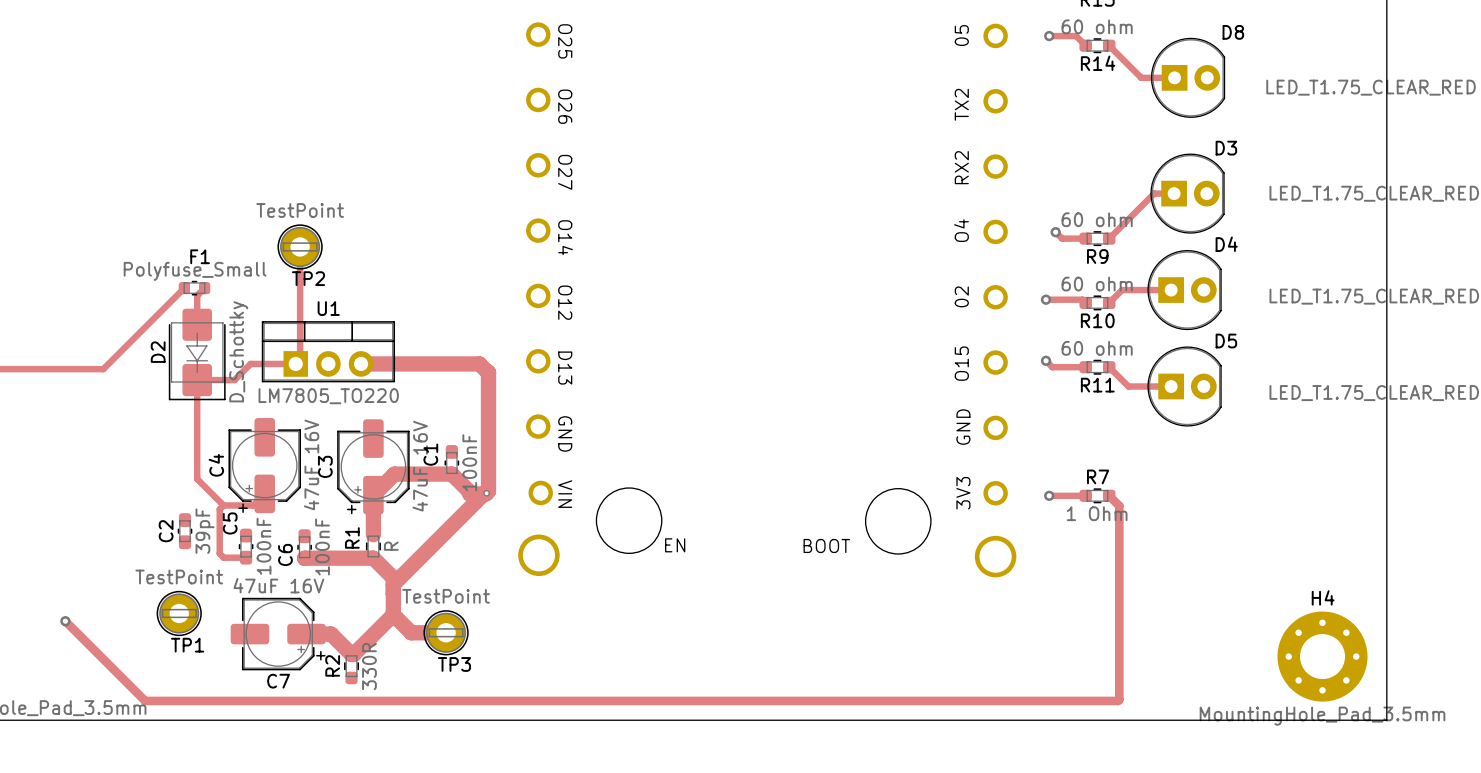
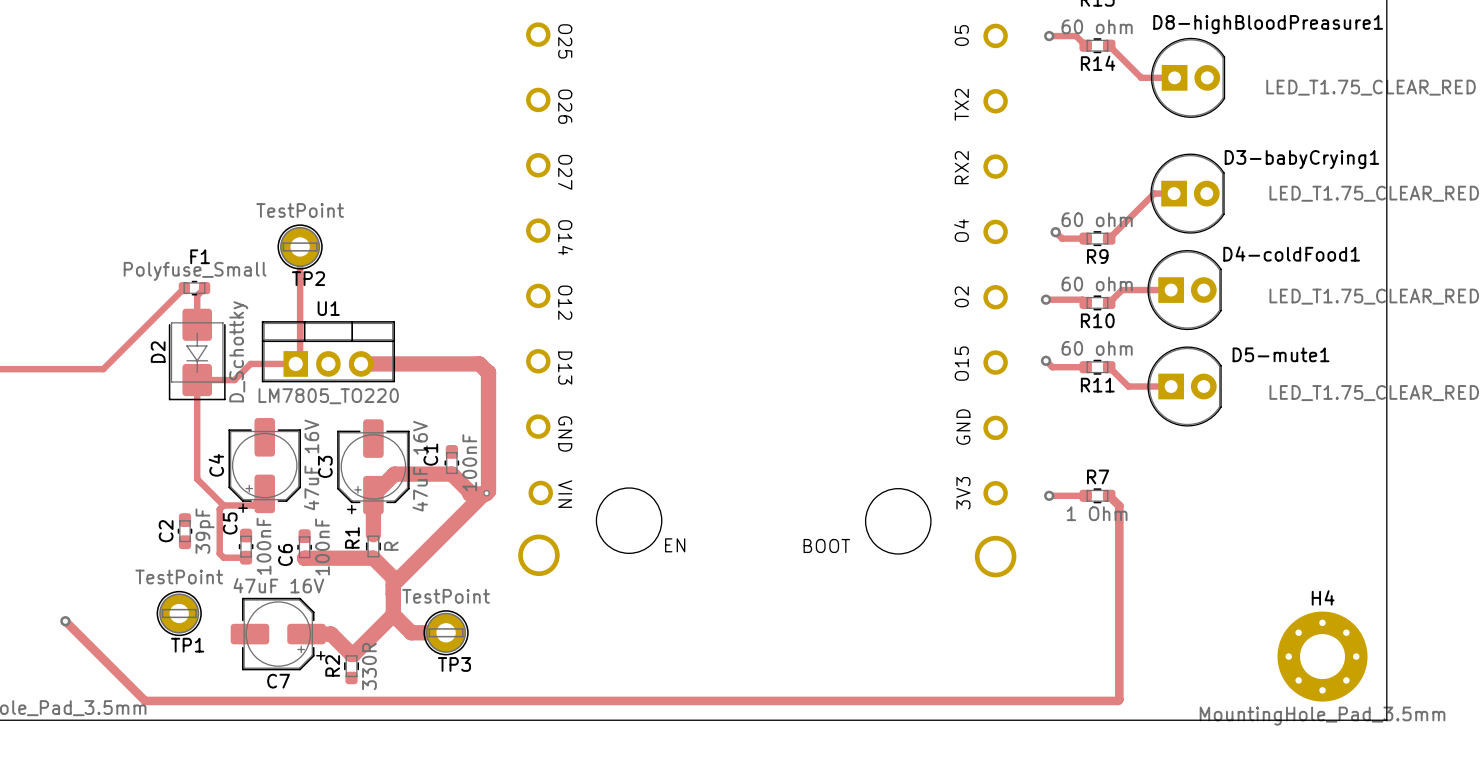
D8 name: D8 (1233, 32) -> D8-highBloodPreasure1 (1268, 24)
D3 name: D3 (1226, 148) -> D3-babyCrying1 (1301, 159)
D4 name: D4 (1226, 244) -> D4-coldFood1 (1291, 253)
D5 name: D5 (1226, 341) -> D5-mute1 (1281, 354)

